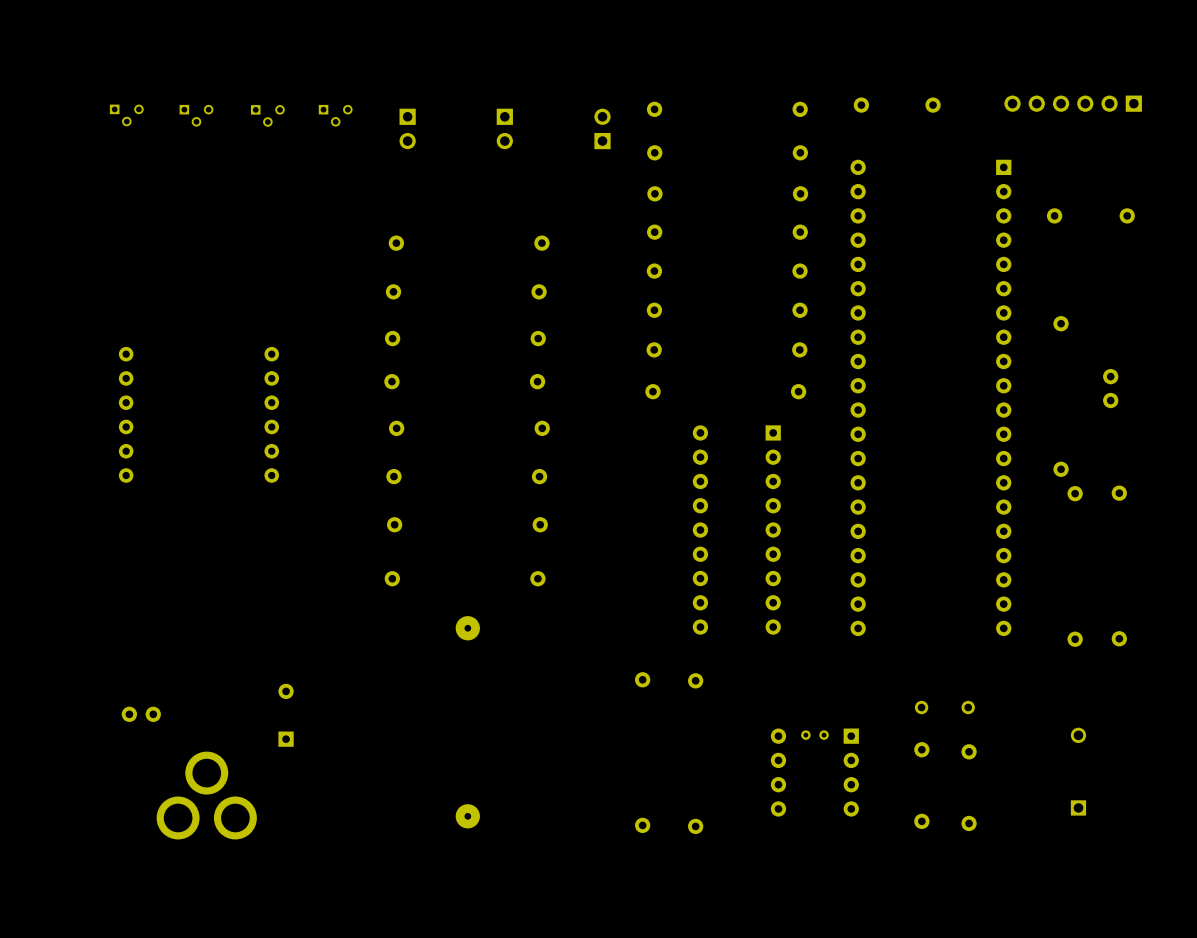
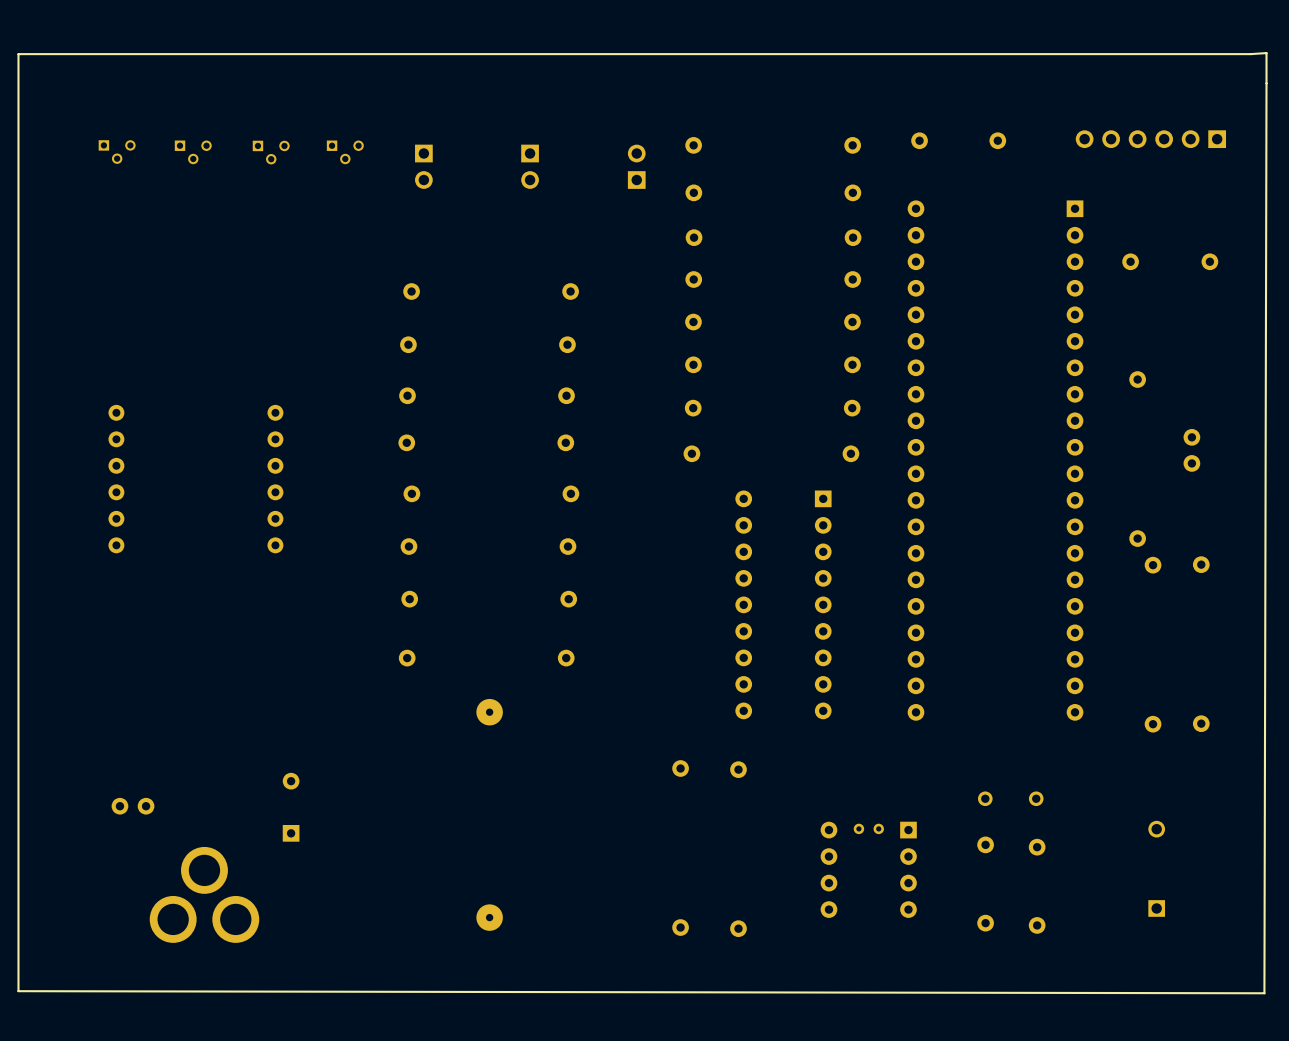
line: none -> (1266, 53) (18, 54) (18, 991) (1264, 993) (1266, 53)

